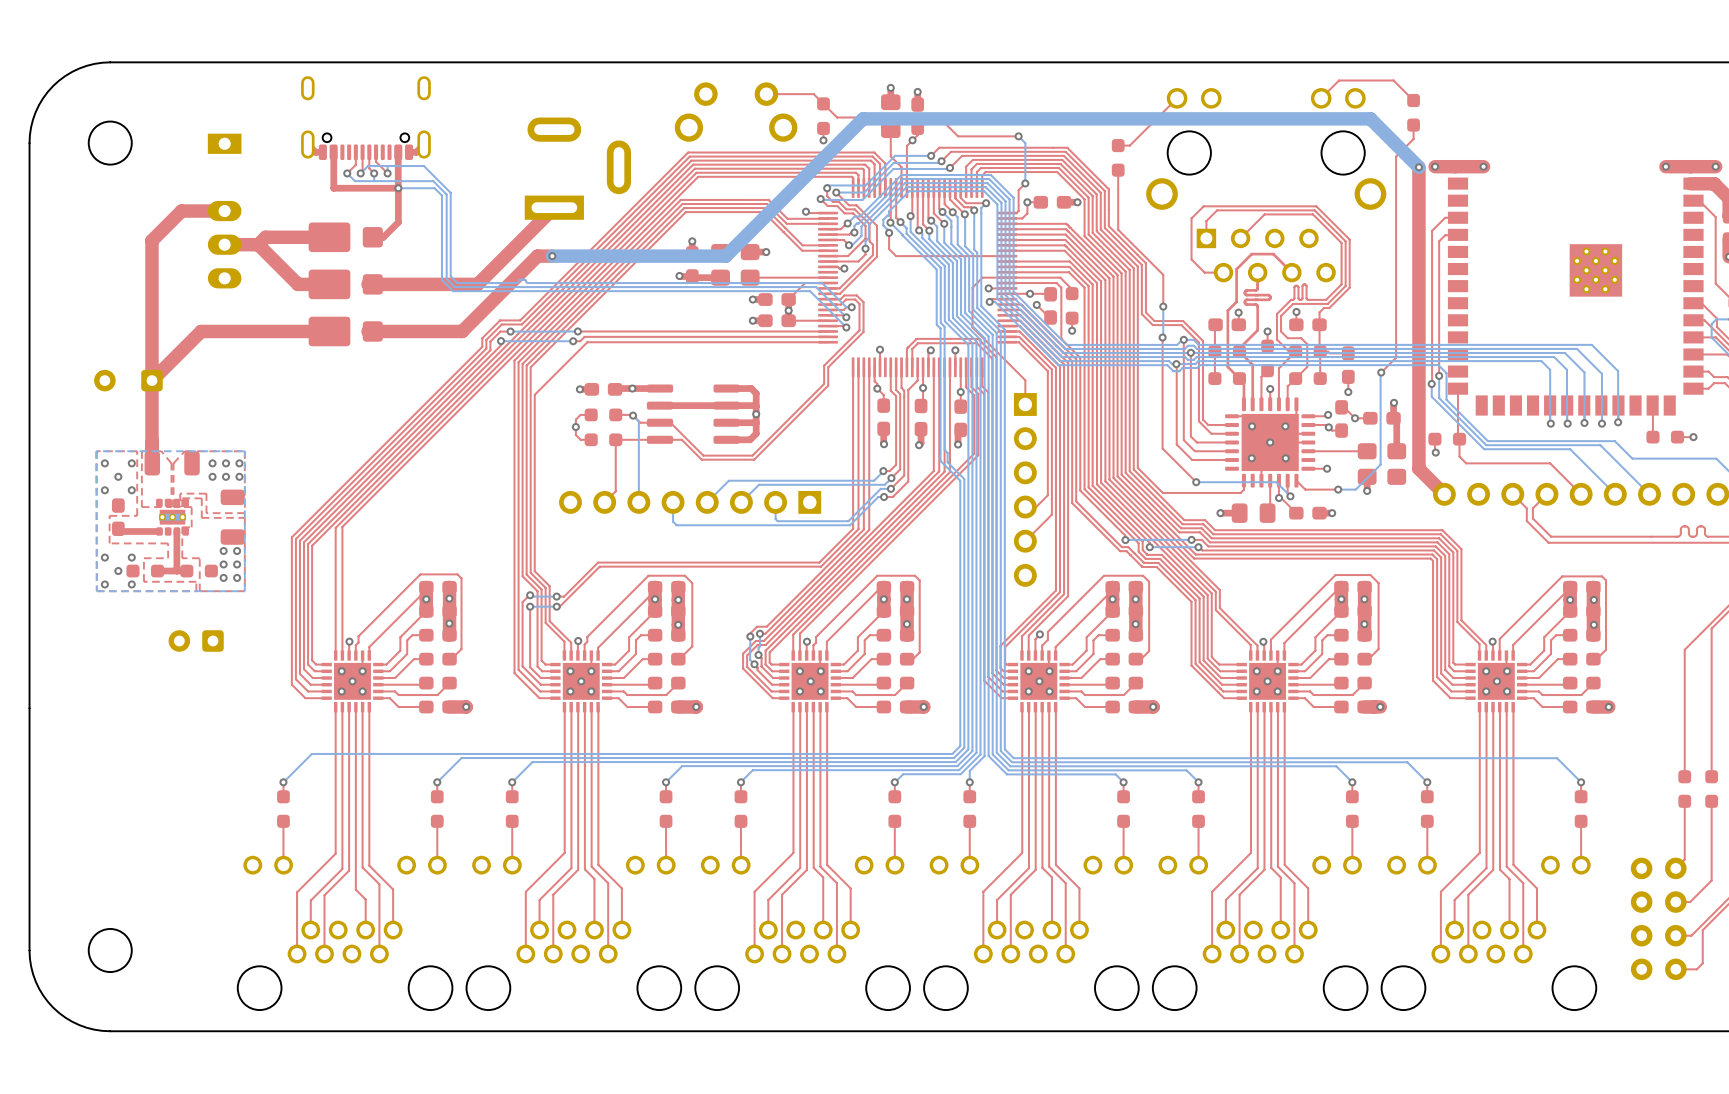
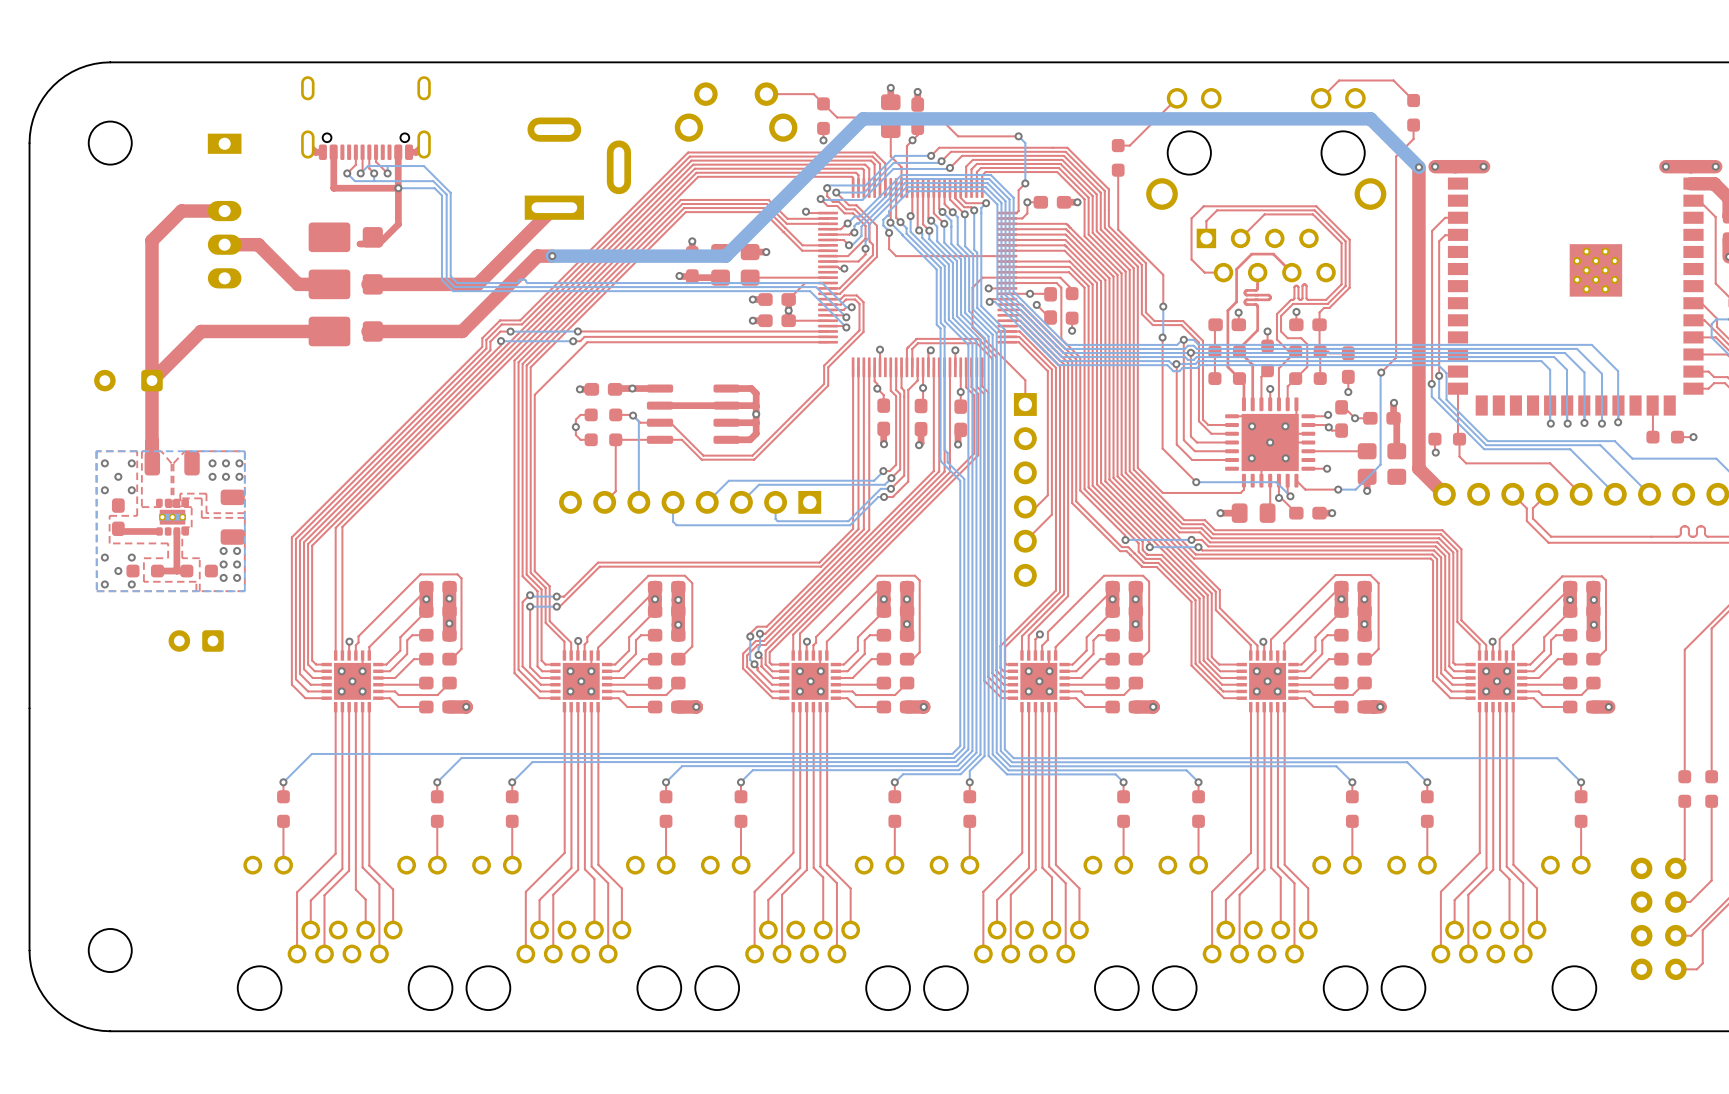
top track: (398, 222) (383, 237) (372, 237) -> (398, 222) (378, 244) (359, 244)
top track: (329, 237) (265, 237) (258, 244) -> none

